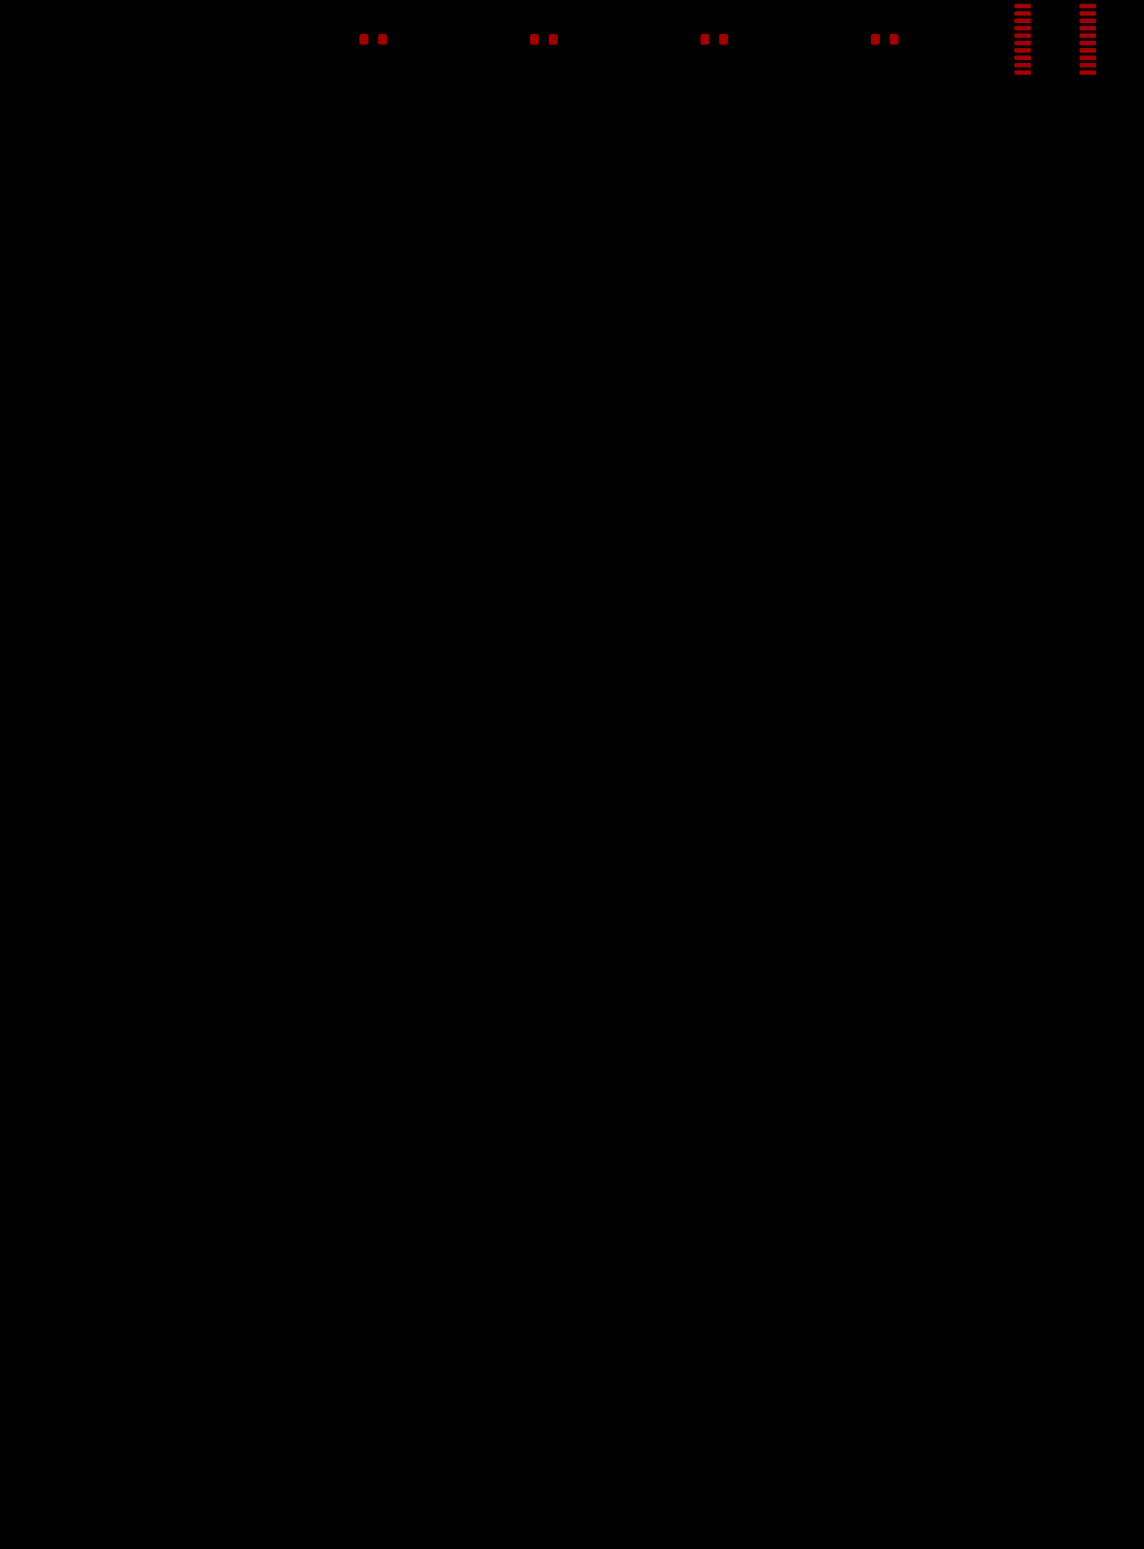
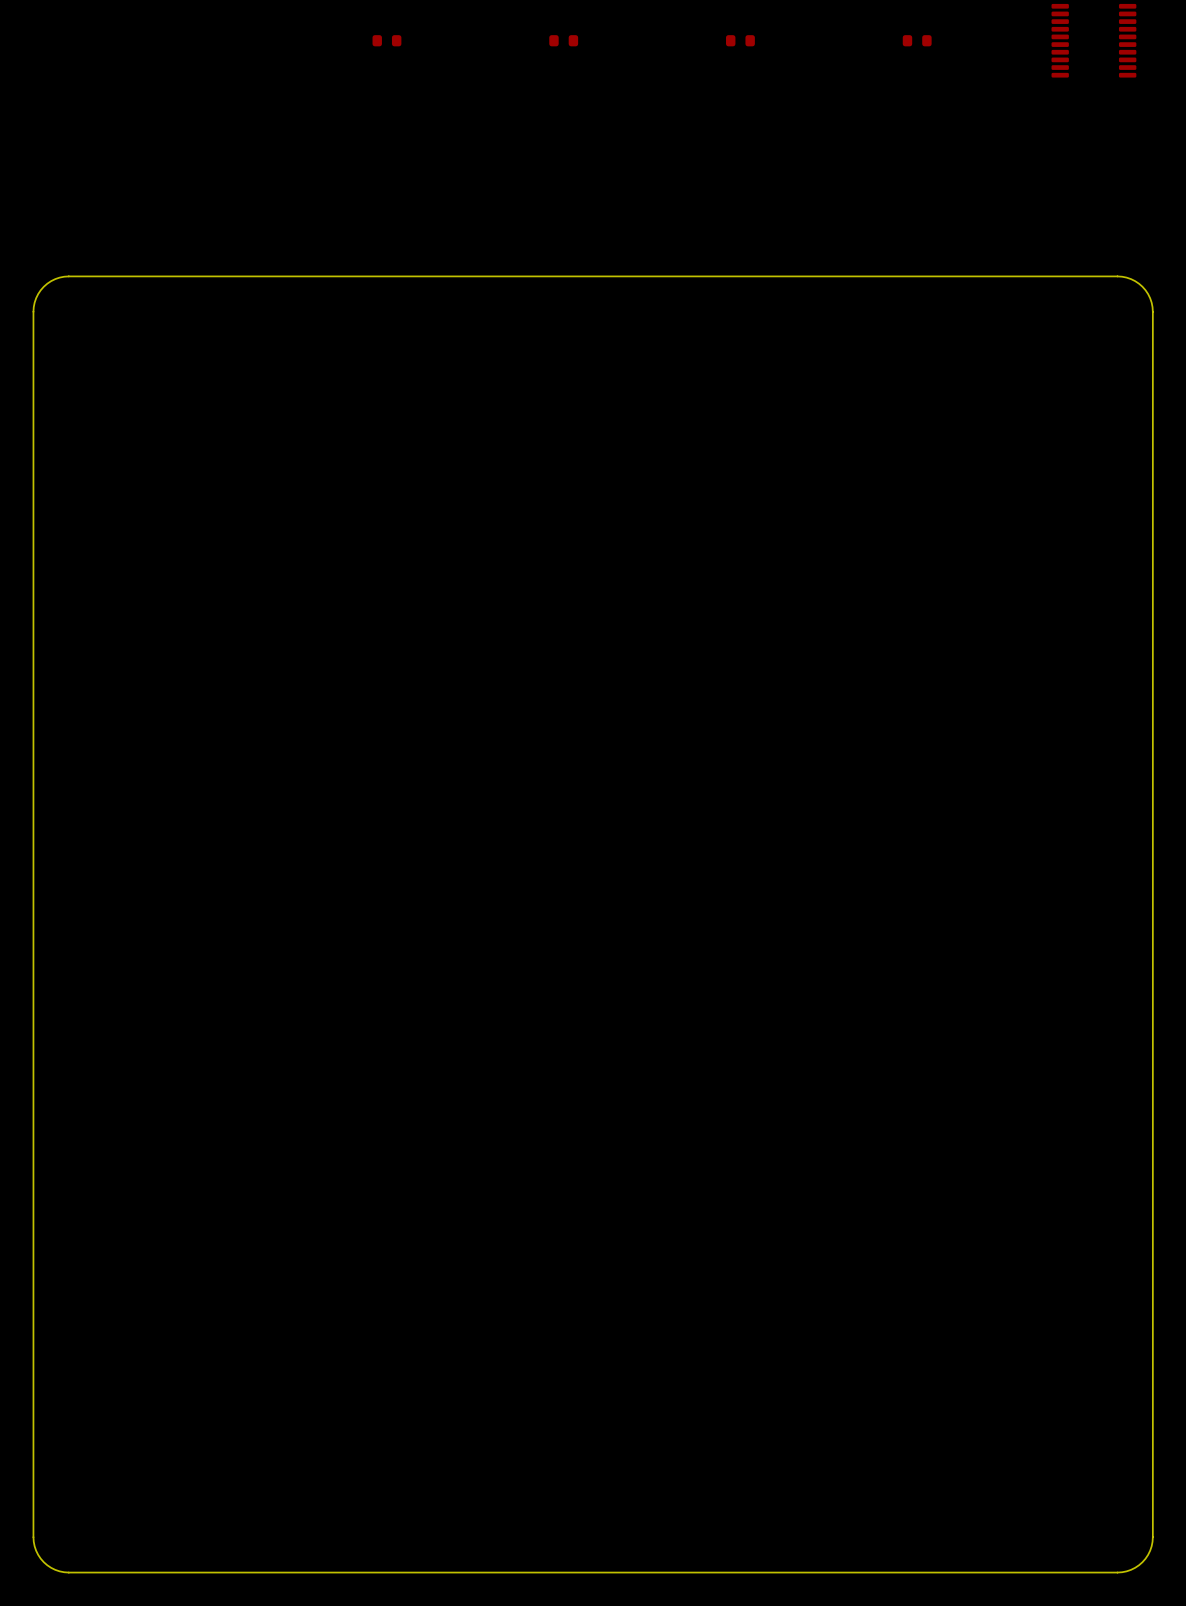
board edge: none -> (1117, 276) (68, 276) (51, 281) (40, 290) (34, 302) (33, 311) (33, 1537) (38, 1554) (47, 1565) (59, 1571) (68, 1572) (1117, 1572) (1135, 1567) (1145, 1558) (1151, 1546) (1152, 1537) (1152, 311) (1150, 298) (1142, 286) (1131, 279) (1117, 276)

